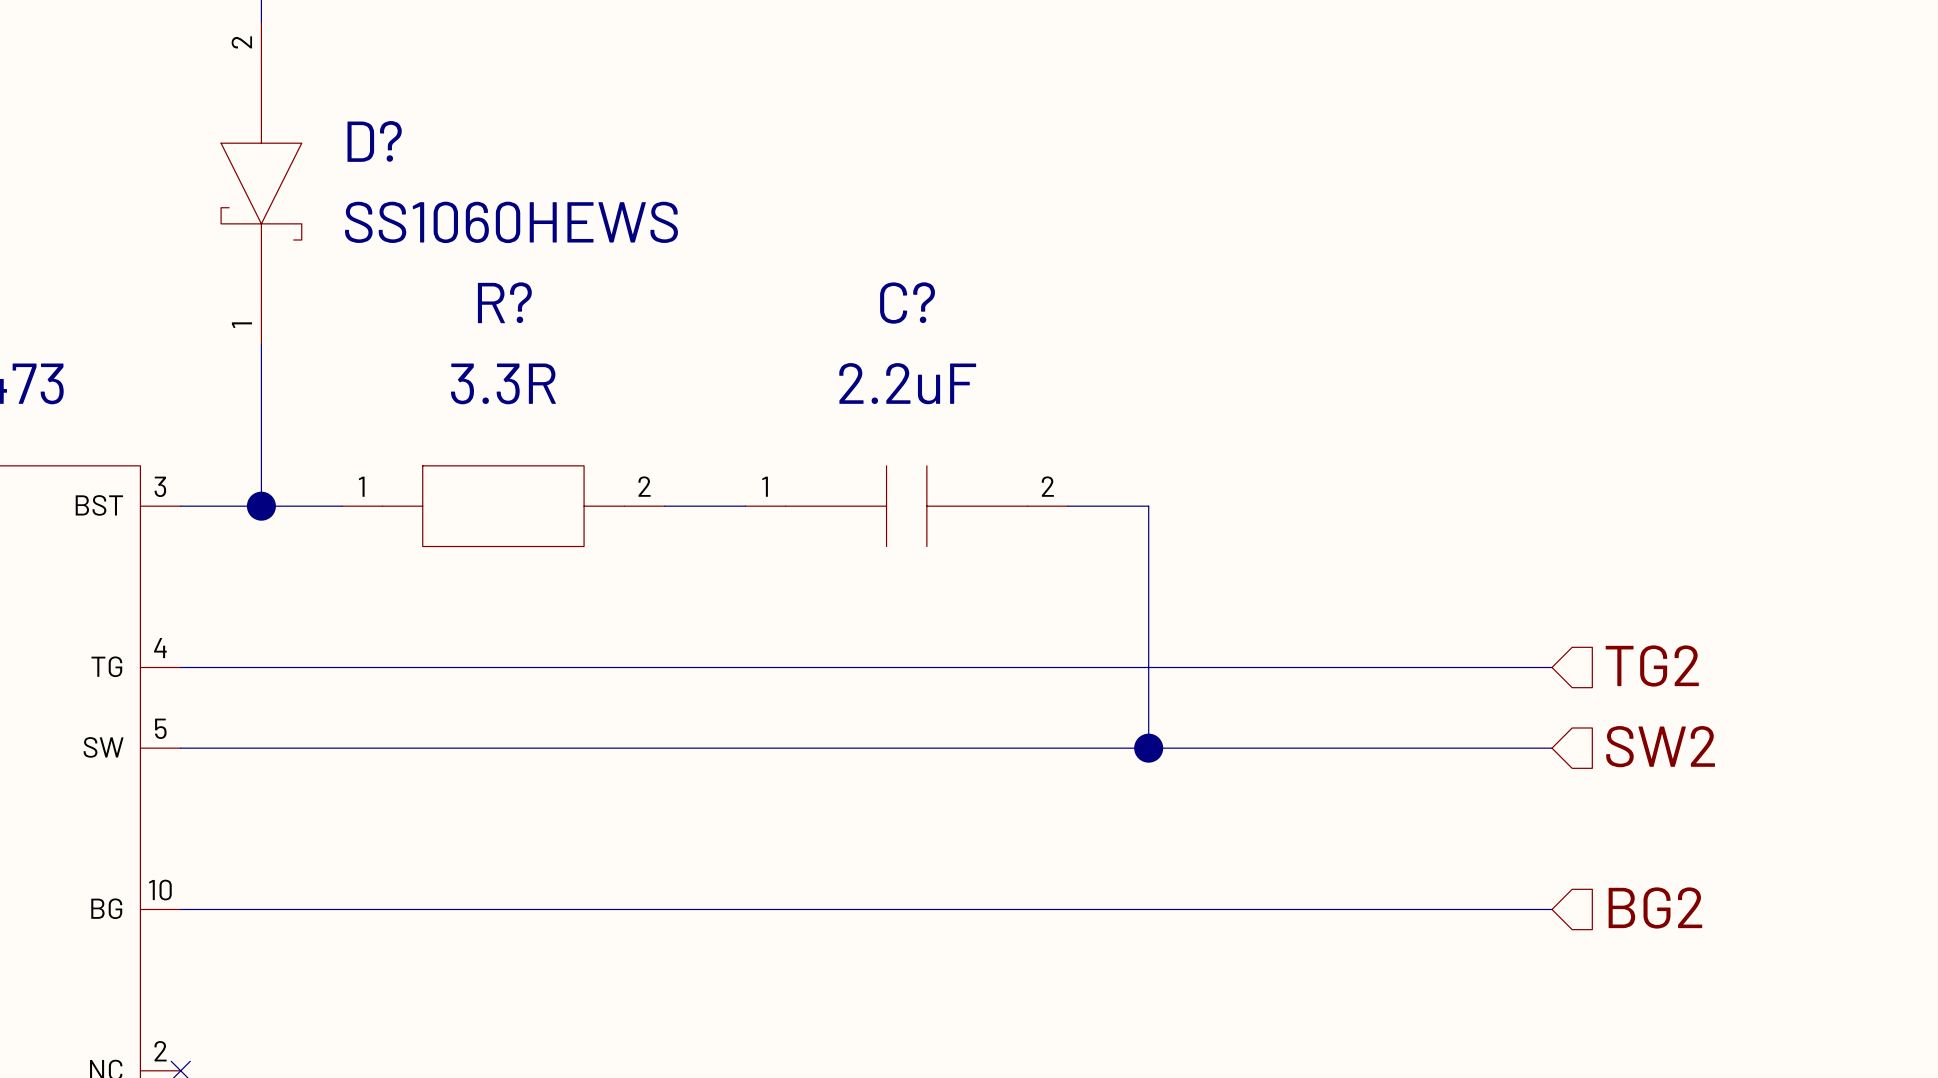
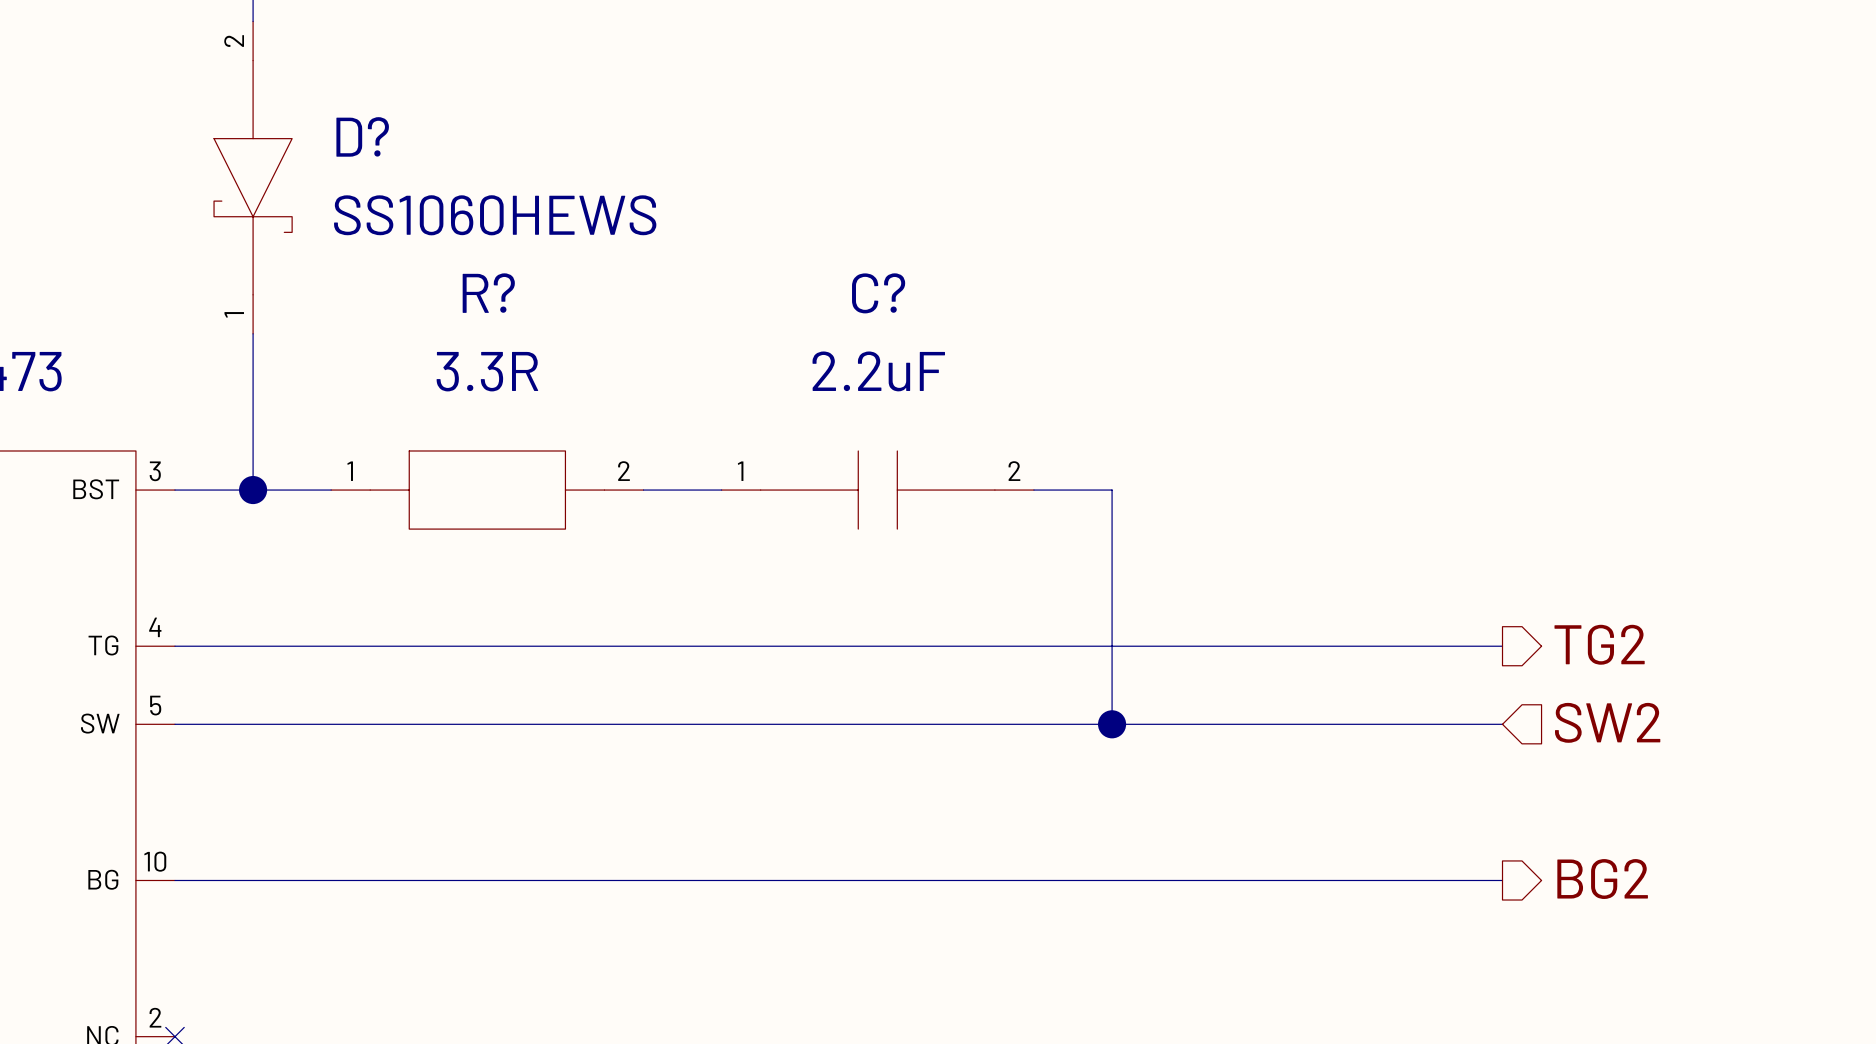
hierarchical label shape: input (1652, 665) -> output (1599, 644)
hierarchical label shape: input (1655, 907) -> output (1602, 879)

